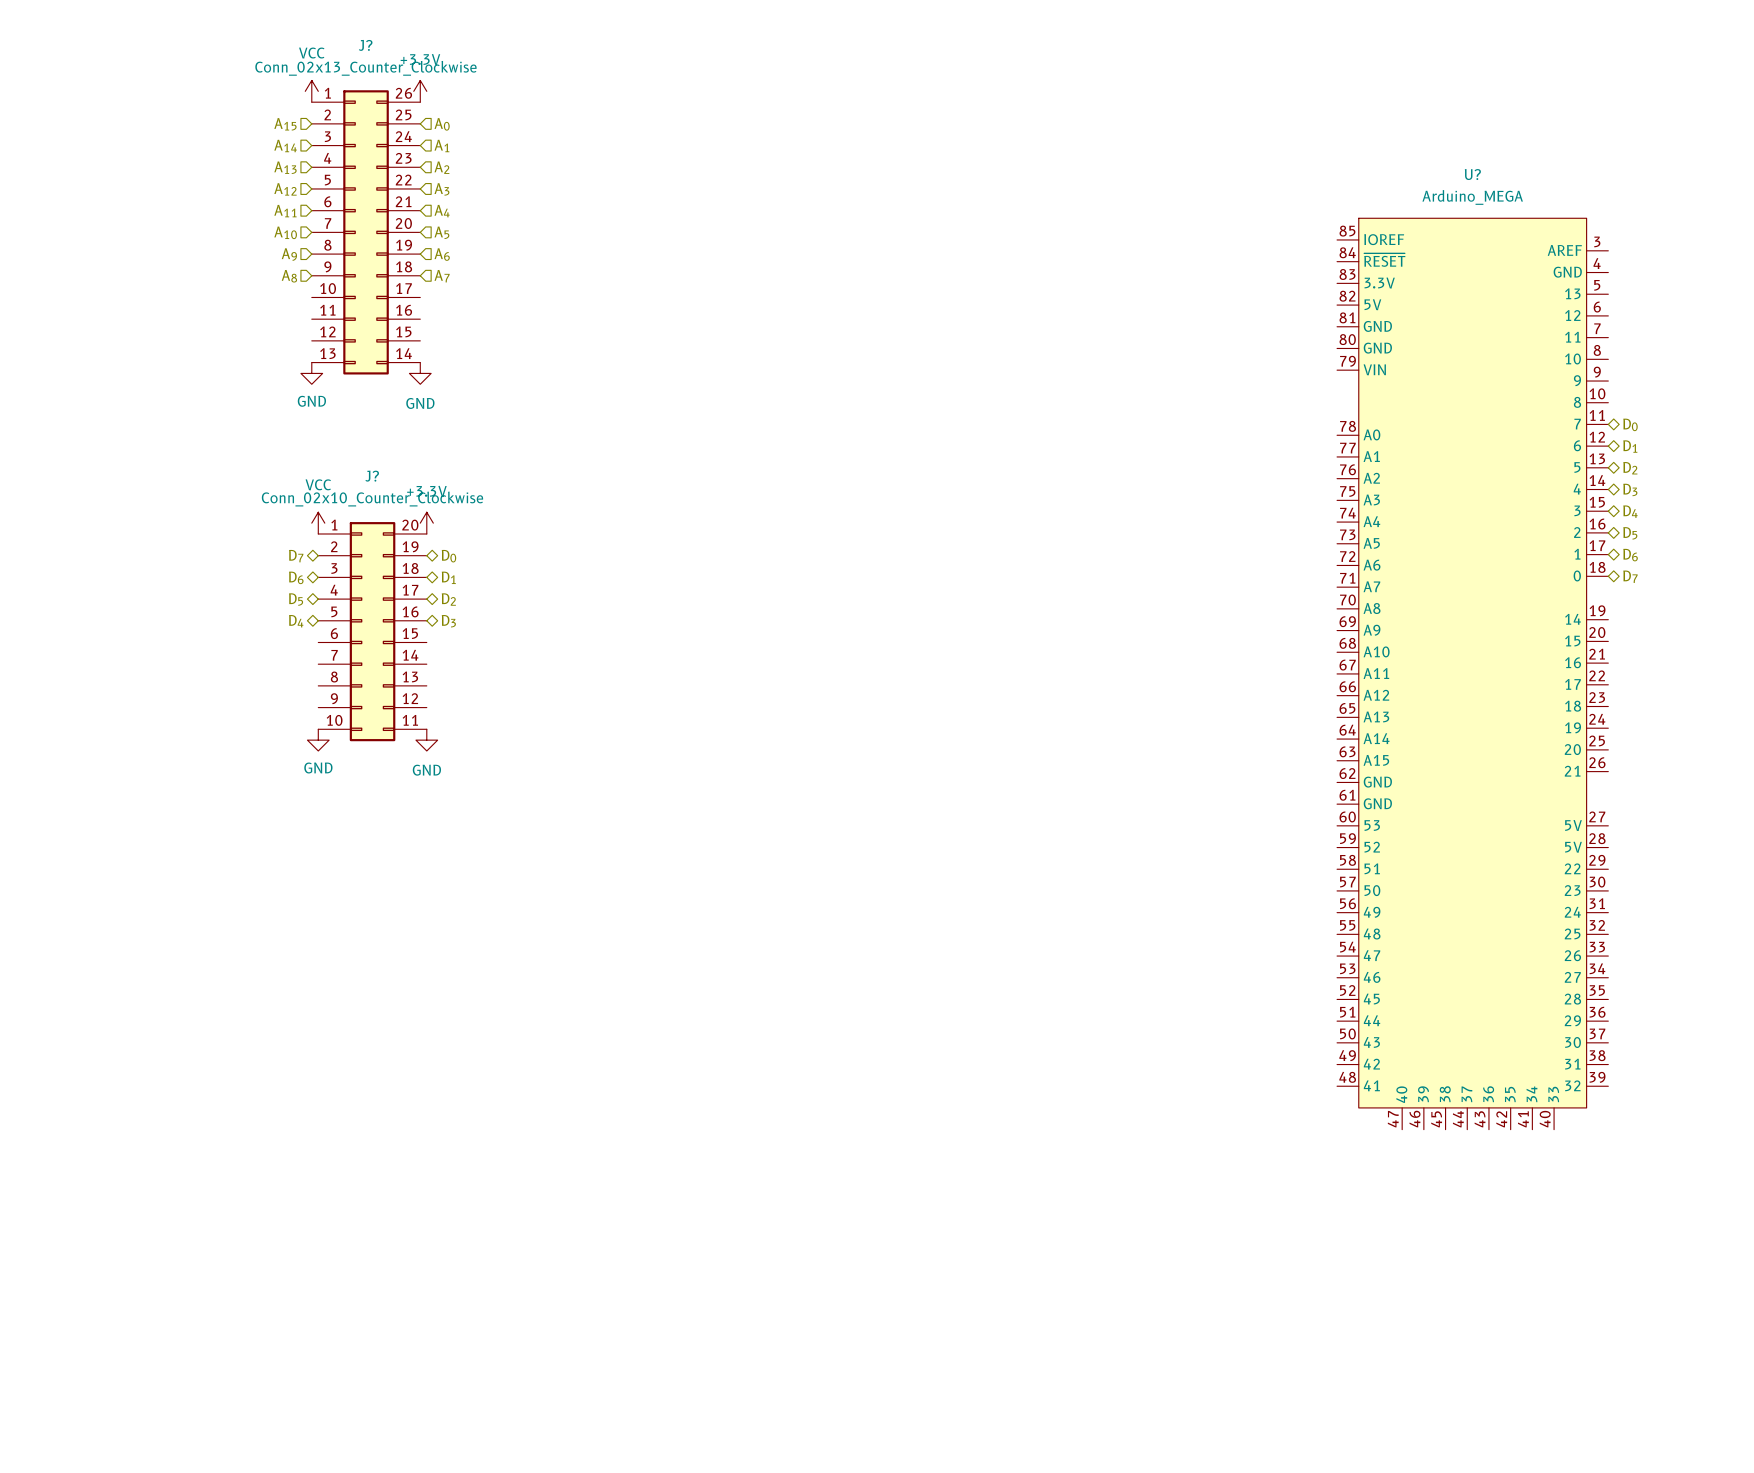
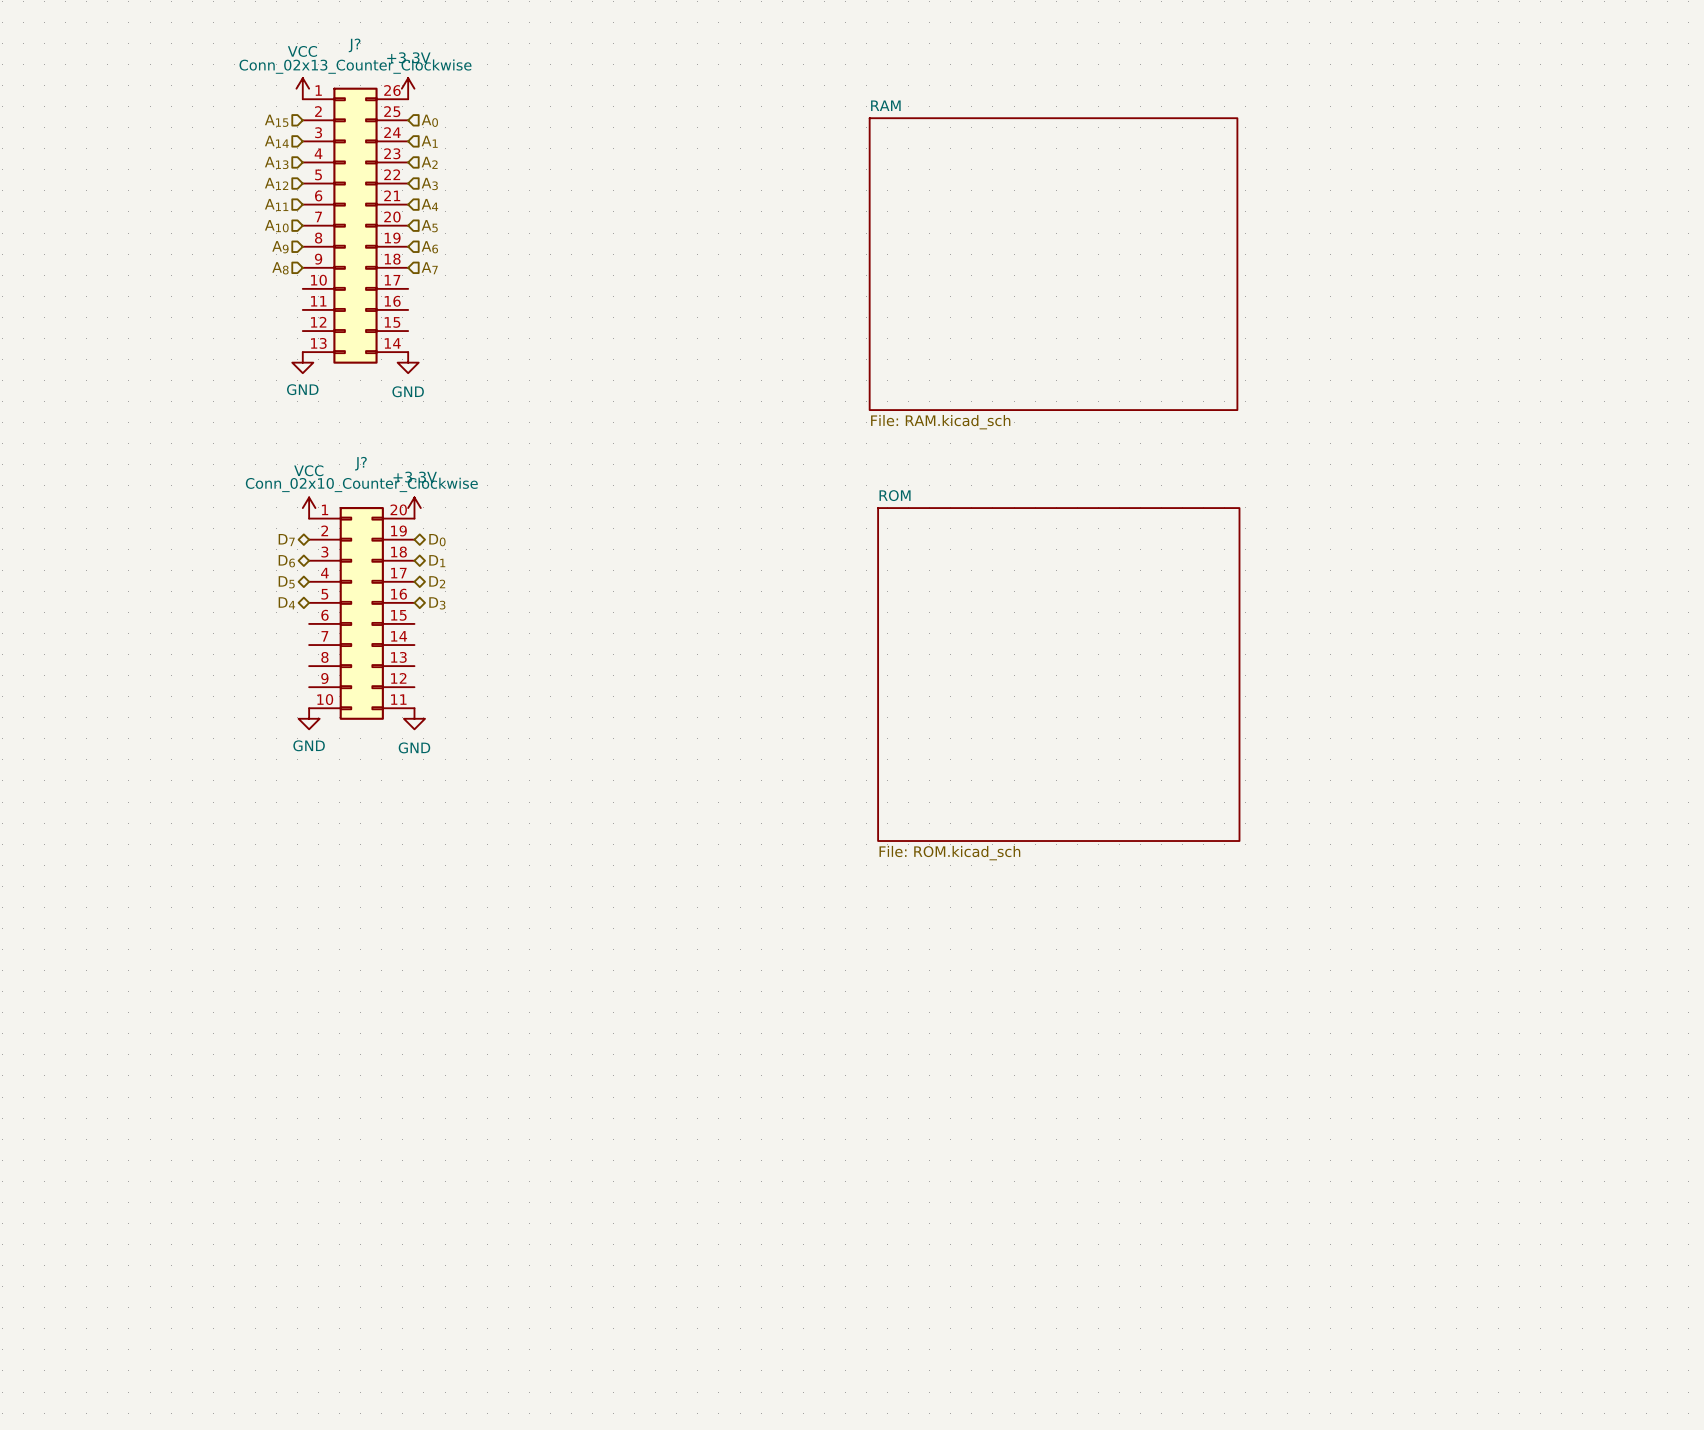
sheet RAM: none -> File: RAM.kicad_sch (1053, 264)
hierarchical label: D0 (1630, 424) -> none
hierarchical label: D1 (1630, 446) -> none
hierarchical label: D2 (1630, 468) -> none
hierarchical label: D3 (1630, 489) -> none
hierarchical label: D4 (1630, 511) -> none
hierarchical label: D5 (1630, 533) -> none
hierarchical label: D6 (1630, 555) -> none
hierarchical label: D7 (1630, 576) -> none
U?: Arduino_MEGA (1472, 673) -> none
sheet ROM: none -> File: ROM.kicad_sch (1058, 674)

